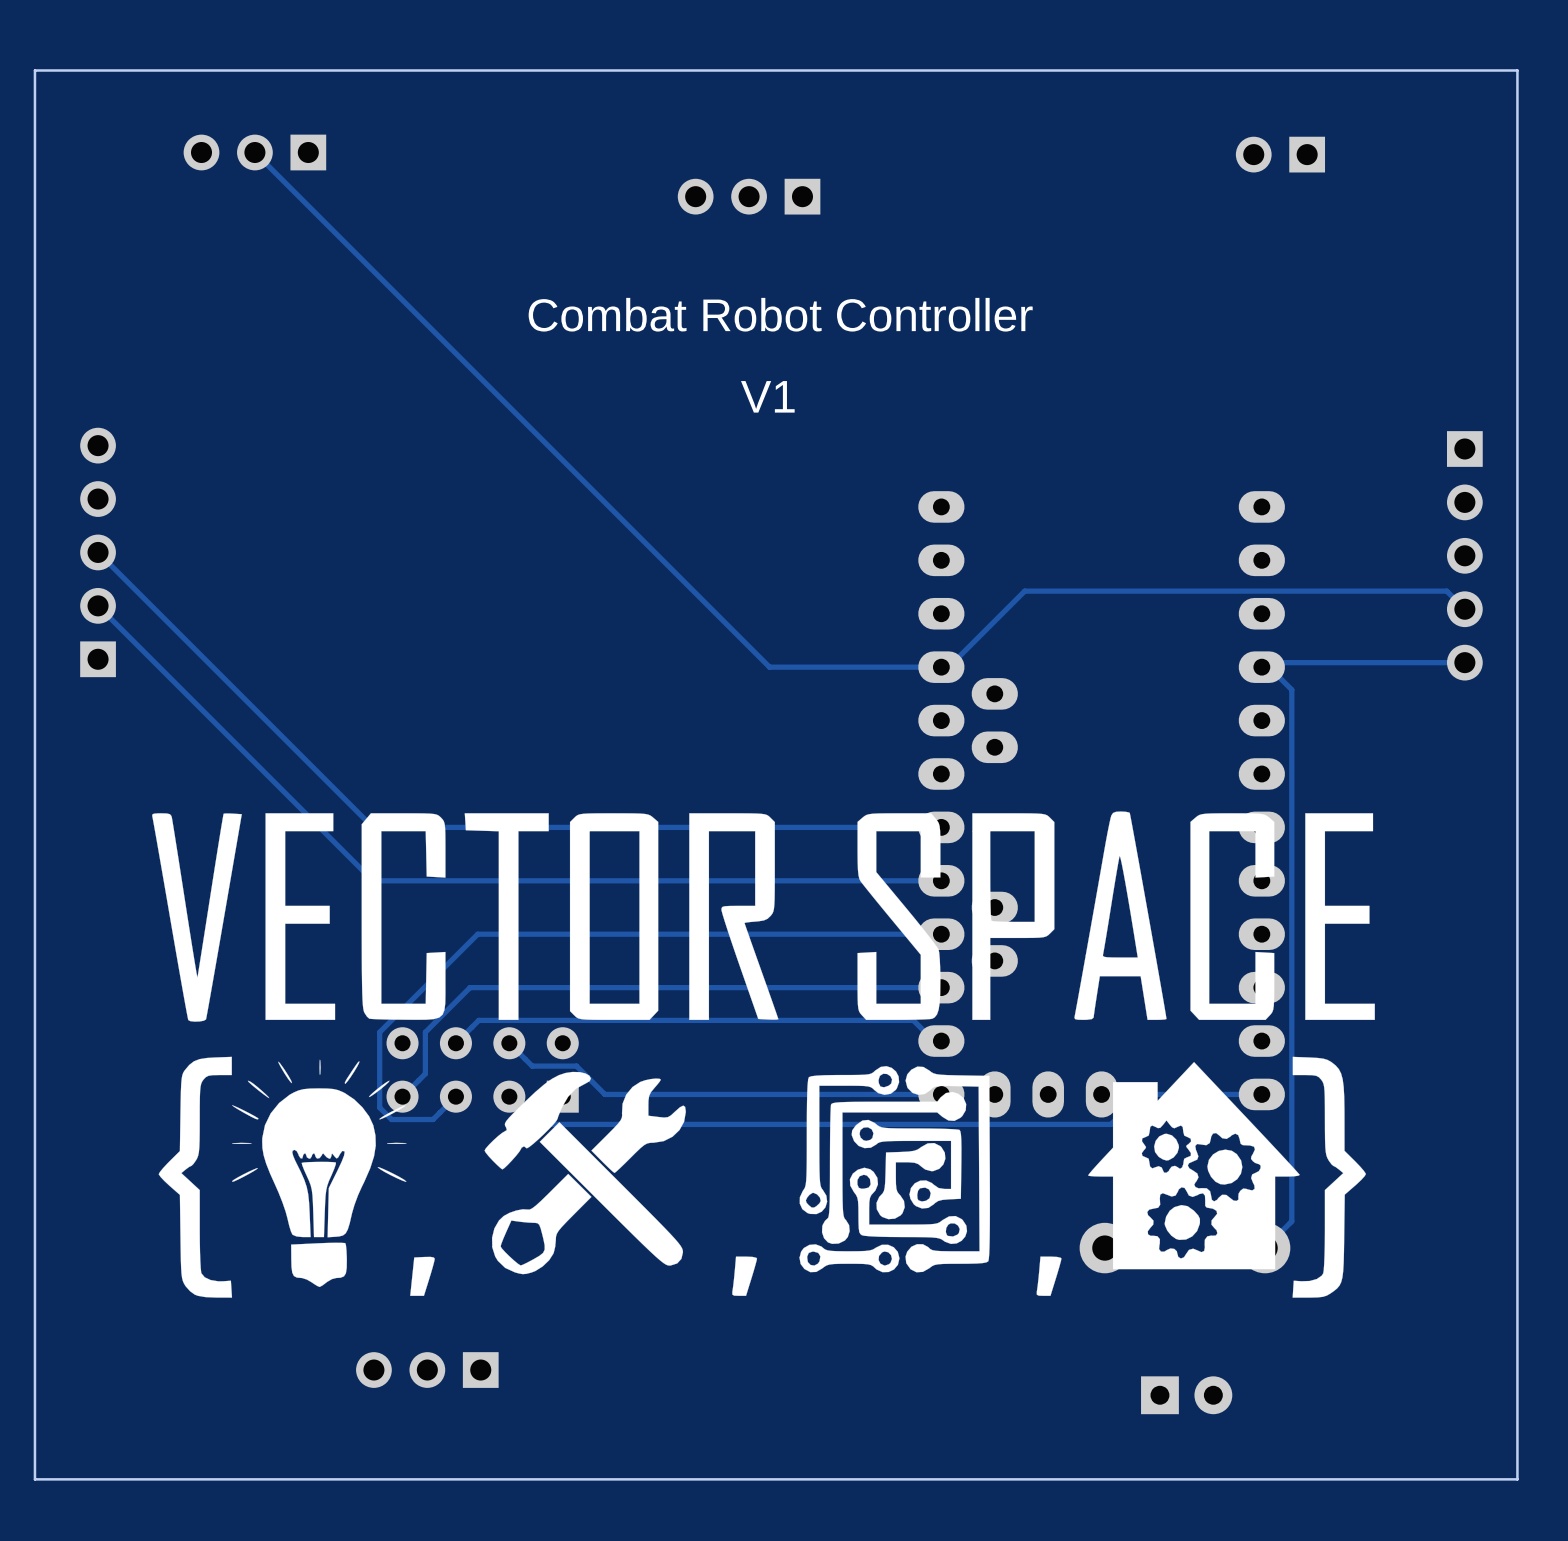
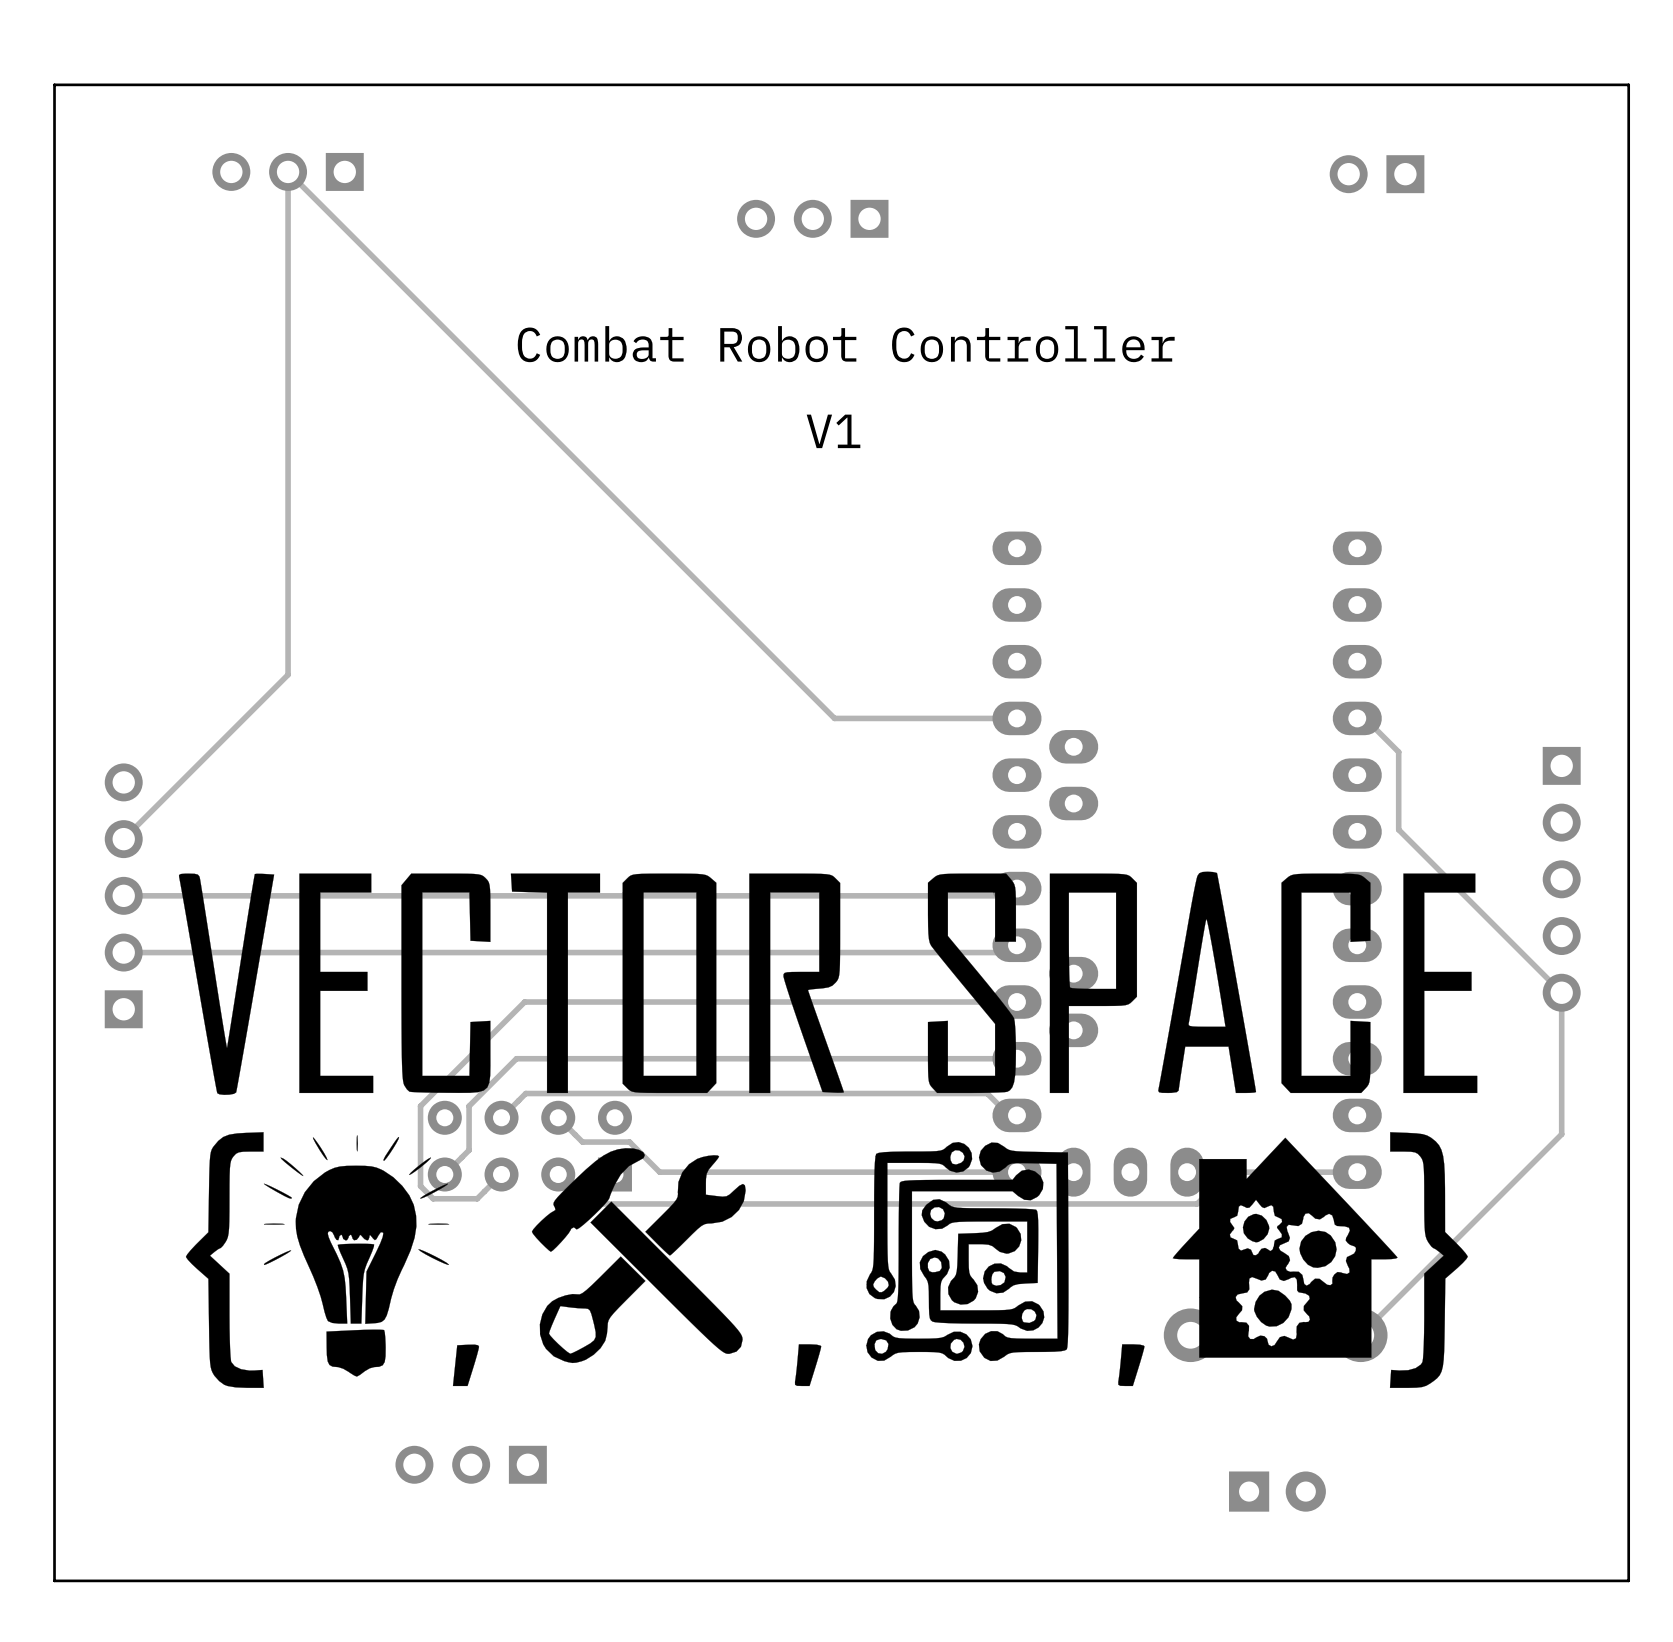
track: none -> (288, 171) (288, 674) (123, 839)
track: (98, 552) (372, 827) (941, 827) -> none
part position: (98, 552) -> (123, 895)
part position: (1464, 555) -> (1561, 879)
track: (98, 605) (372, 880) (941, 880) -> (123, 952) (1009, 952) (1016, 945)
track: (1464, 609) (1446, 591) (1024, 591) (948, 667) (941, 667) -> none
track: (1464, 662) (1266, 662) (1261, 667) -> none
track: (1291, 689) (1291, 1221) -> (1389, 742) (1398, 752) (1398, 829) (1561, 992) (1561, 1134) (1389, 1306)
track: none -> (1009, 895) (123, 895)

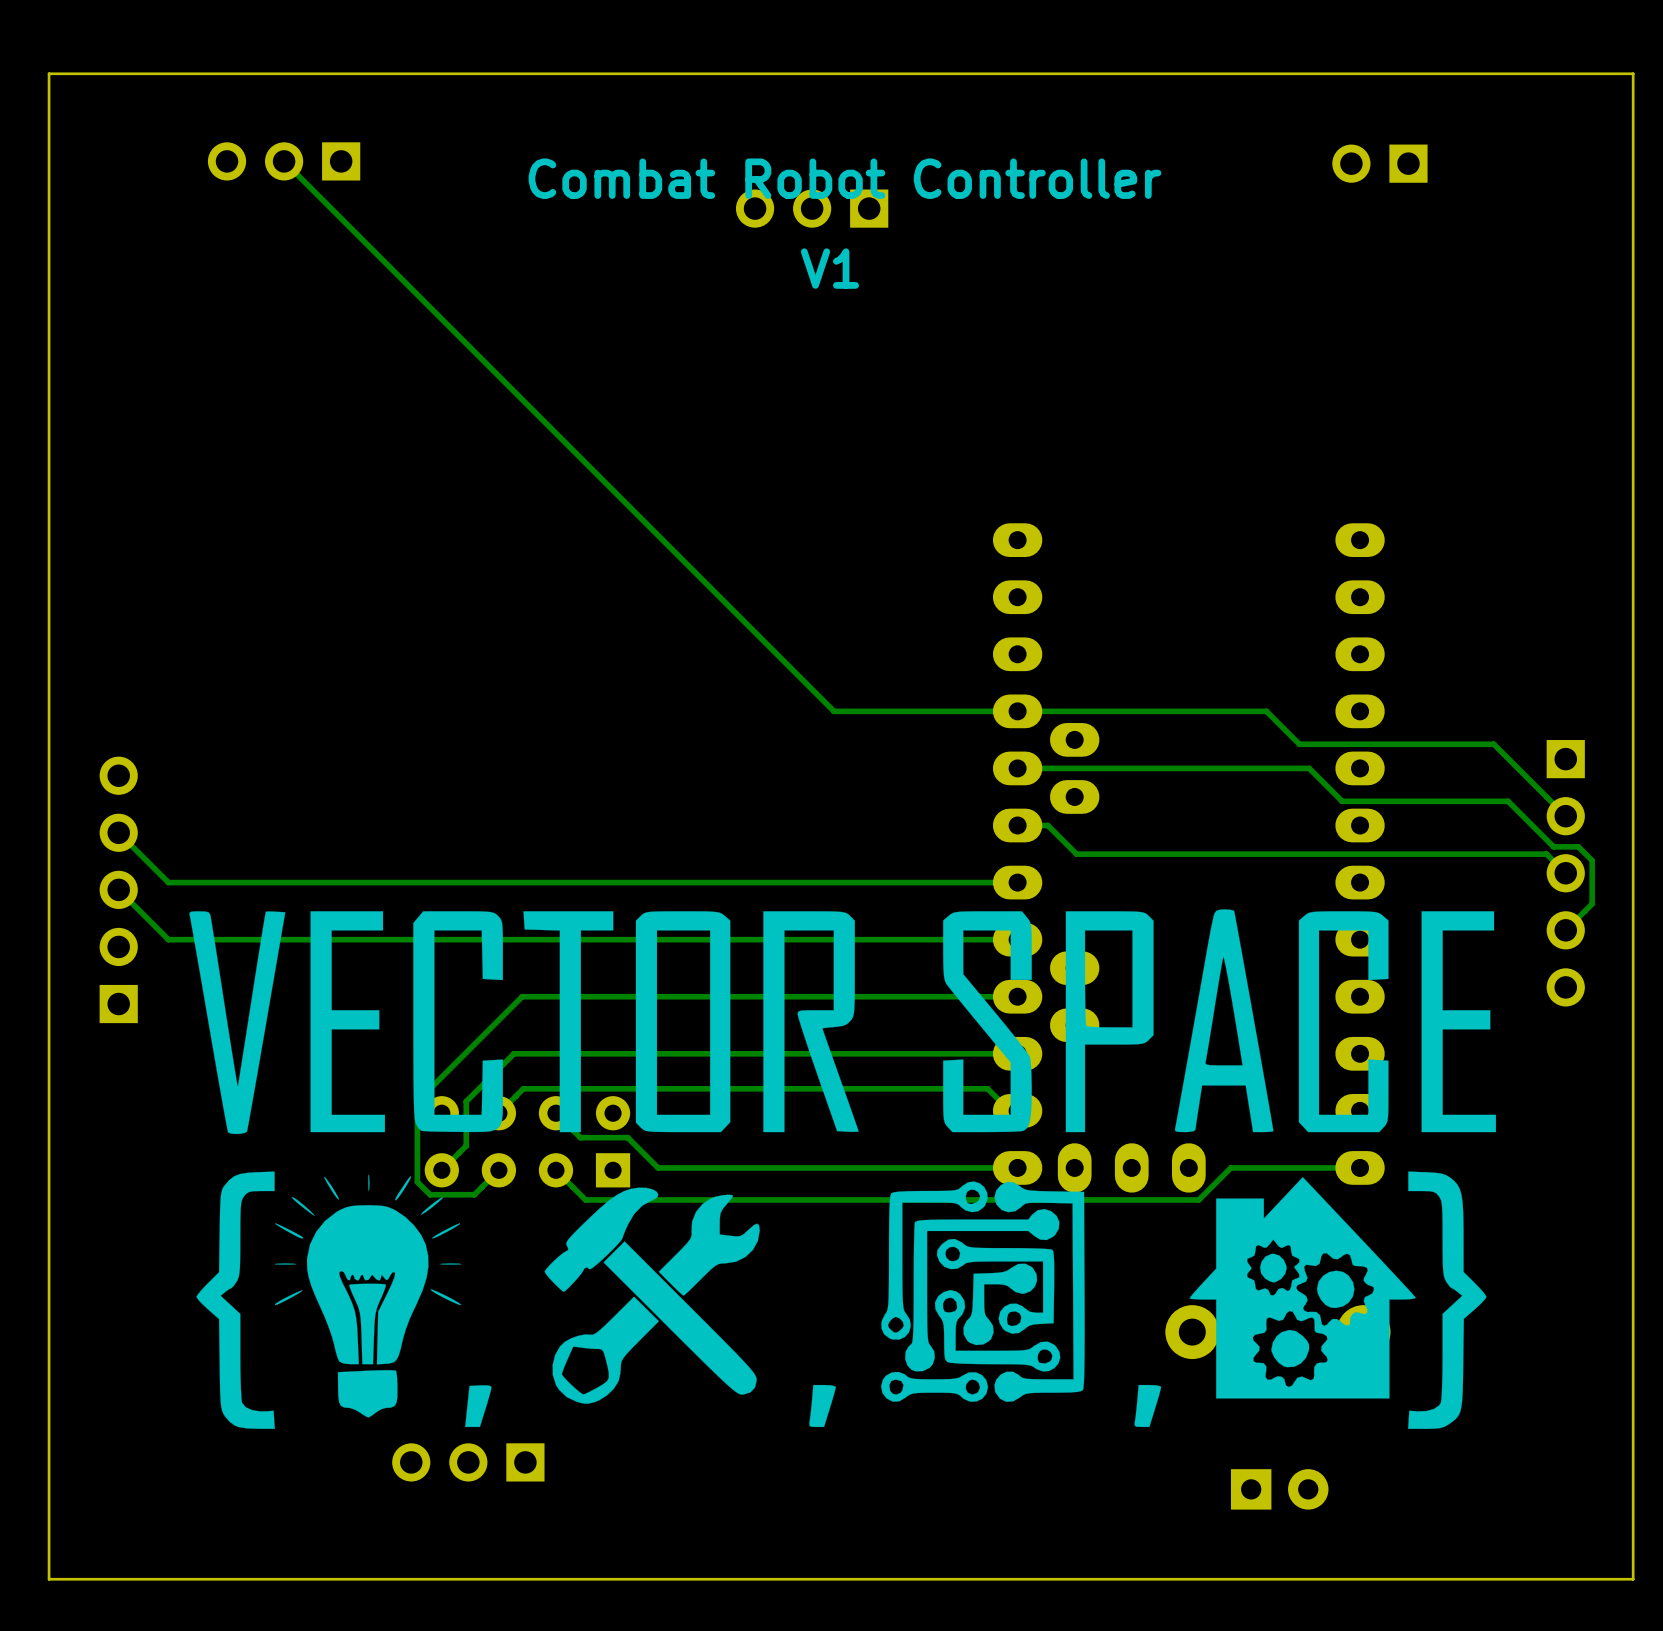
track: (288, 171) (288, 674) (123, 839) -> none
text position: Combat Robot Controller (846, 344) -> Combat Robot Controller (844, 178)
text position: V1 (833, 431) -> V1 (829, 268)
track: none -> (1017, 711) (1266, 711) (1299, 744) (1493, 744) (1565, 816)
track: (1357, 718) (1365, 718) (1398, 752) (1398, 829) (1561, 992) (1561, 1134) (1360, 1335) -> none
track: none -> (1017, 768) (1309, 768) (1342, 801) (1508, 801) (1553, 846) (1578, 846) (1592, 860) (1592, 903) (1565, 930)
track: none -> (1017, 825) (1047, 825) (1076, 854) (1546, 854) (1565, 873)
track: (1016, 888) (1009, 895) (123, 895) -> (1017, 882) (168, 882) (118, 832)
track: (1016, 945) (1009, 952) (123, 952) -> (1017, 939) (168, 939) (118, 889)
drawing position: (828, 1129) -> (842, 1169)

